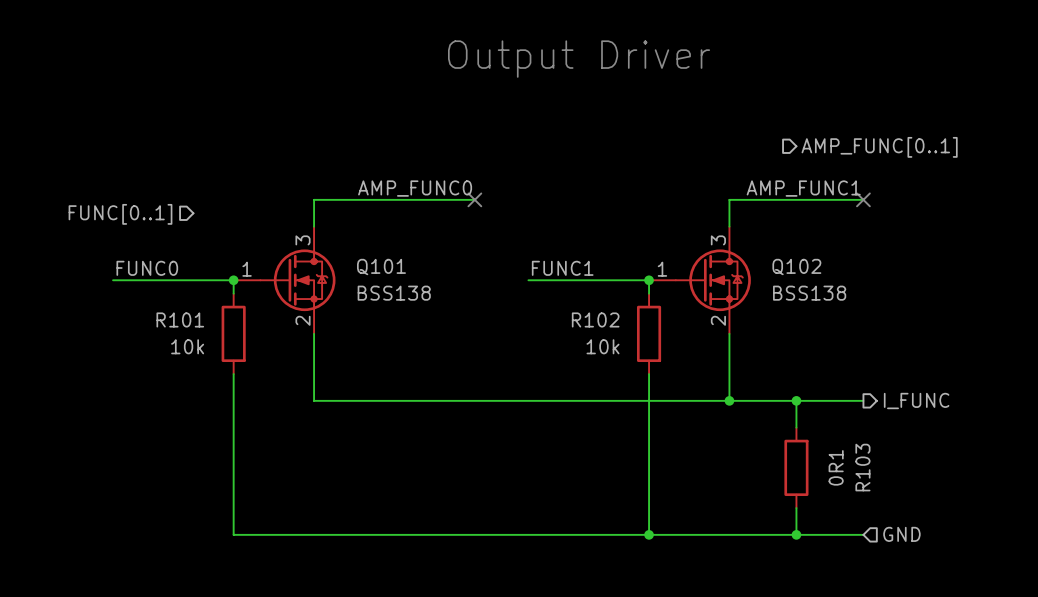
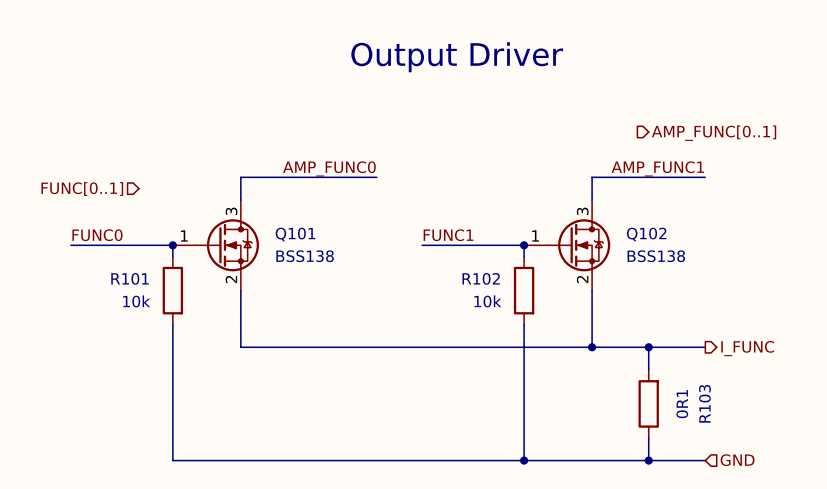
no-connect mark: (474, 199) -> none
no-connect mark: (863, 199) -> none

